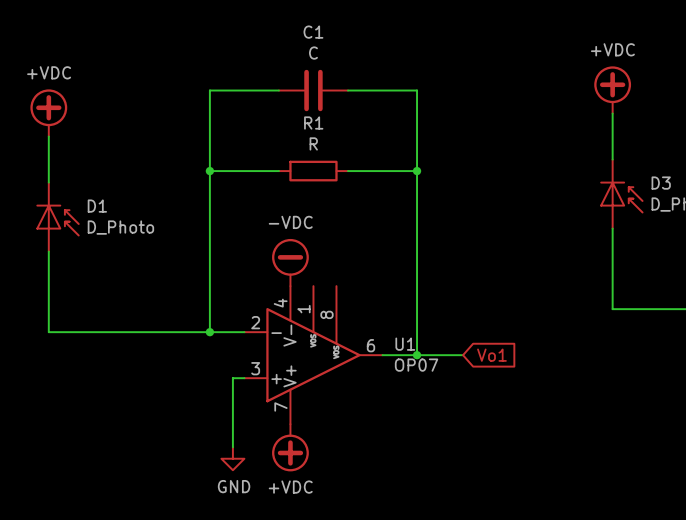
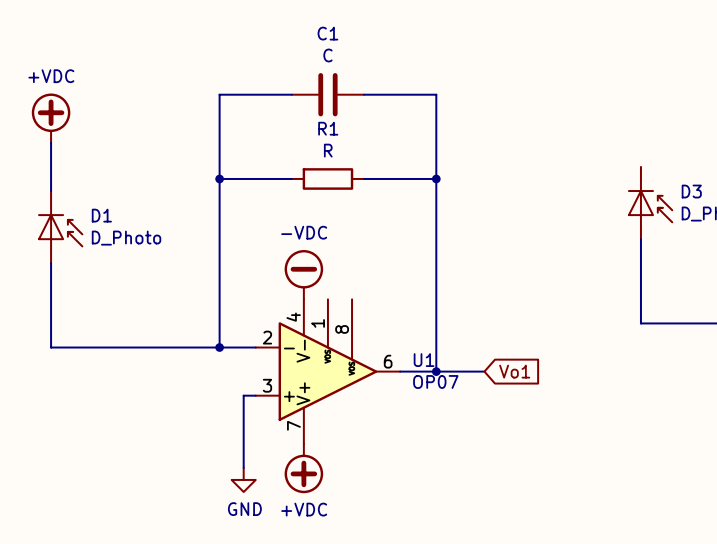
power symbol: +VDC (612, 89) -> none
wire: (612, 113) (612, 159) -> none

